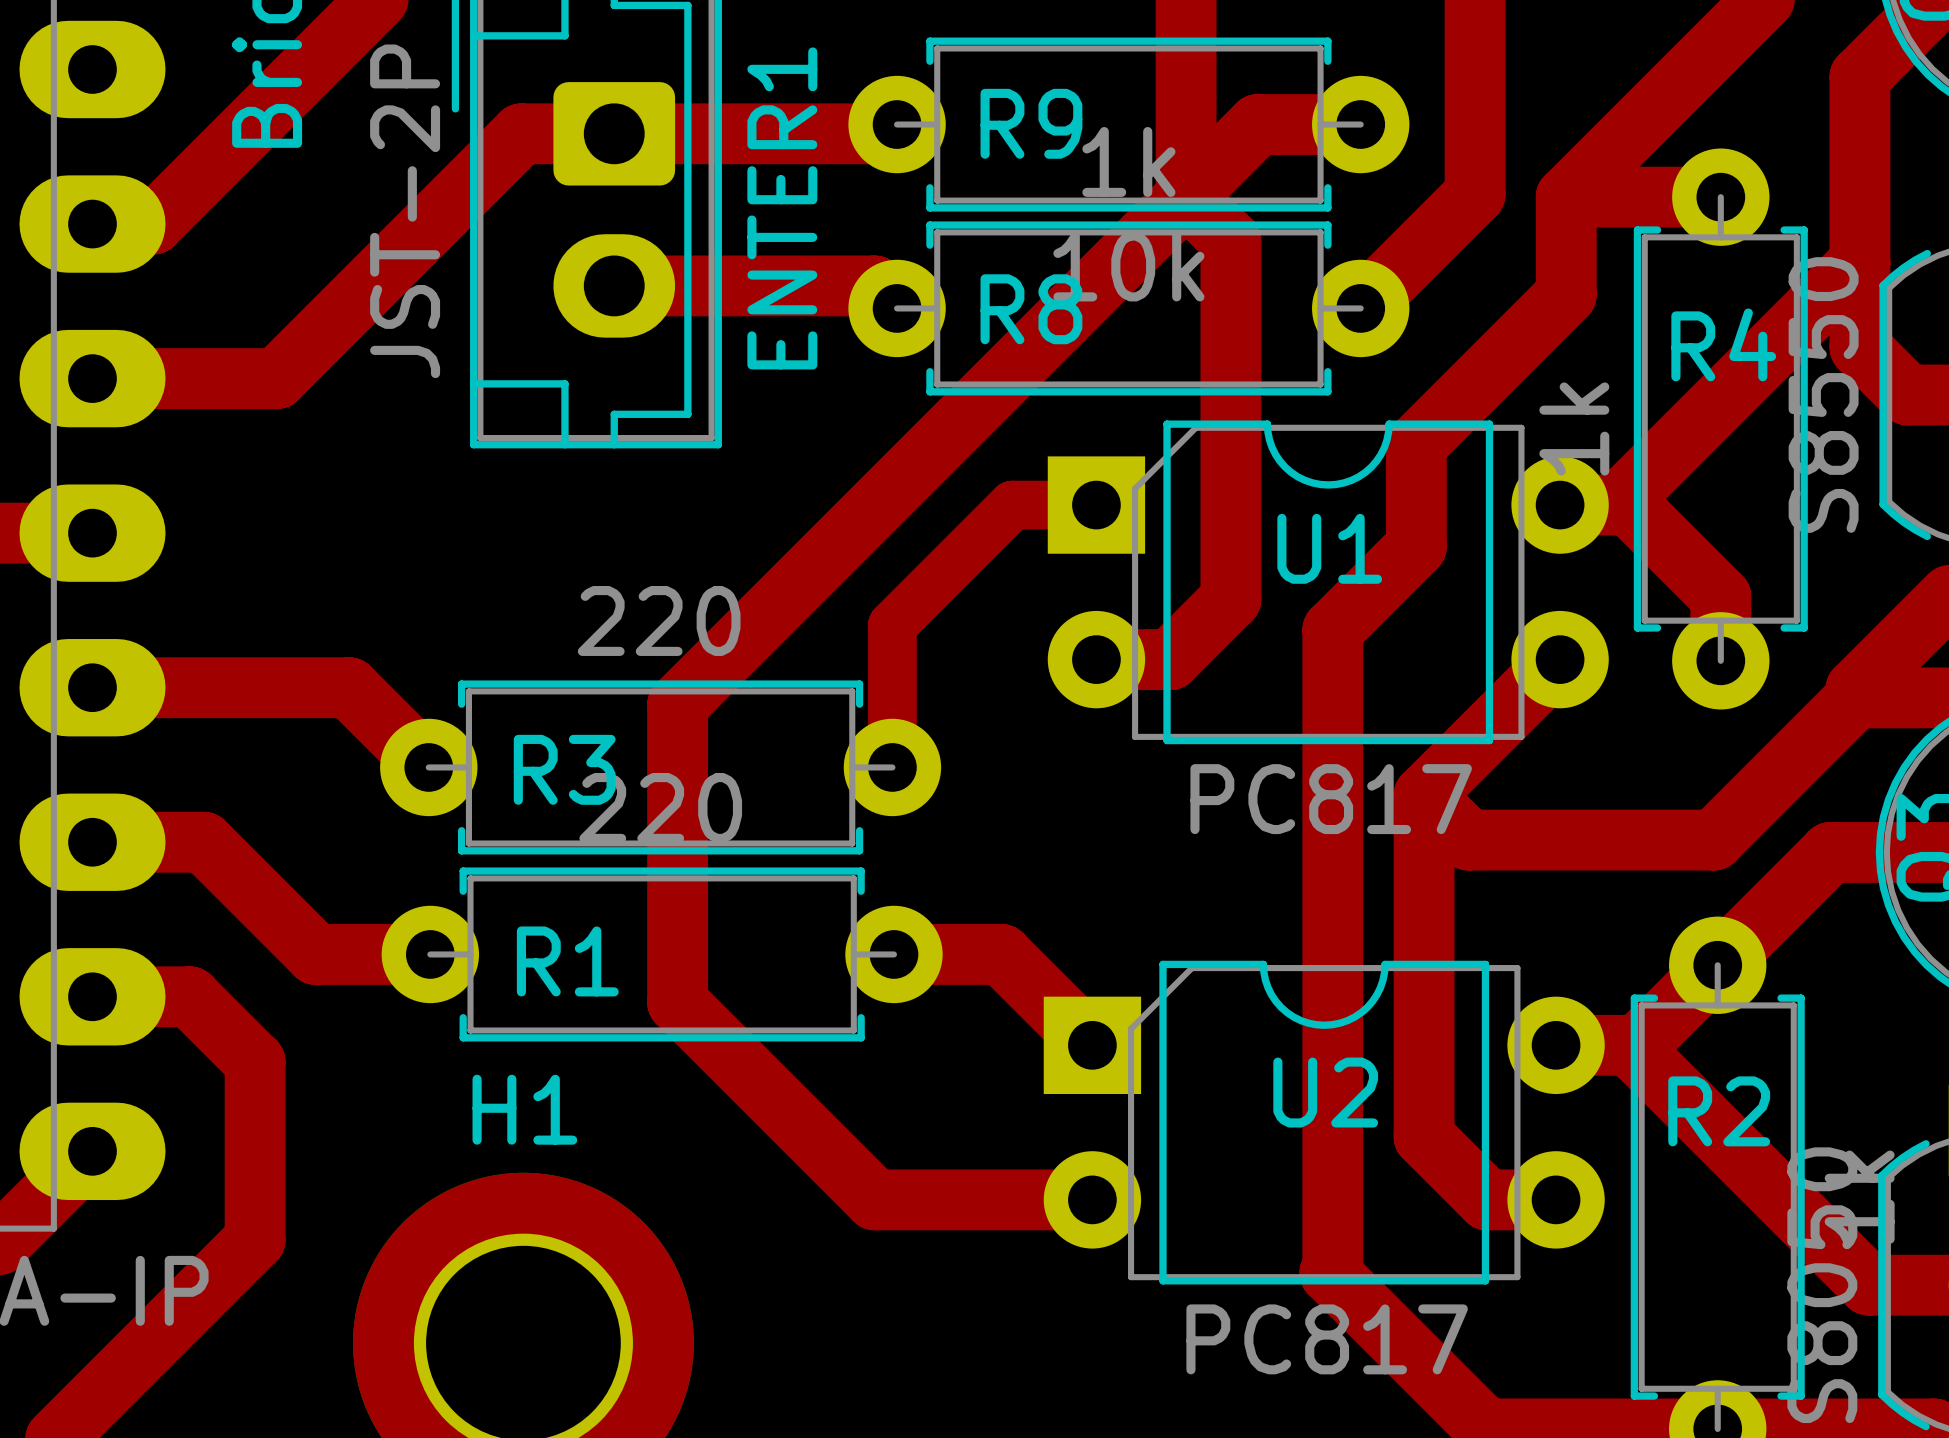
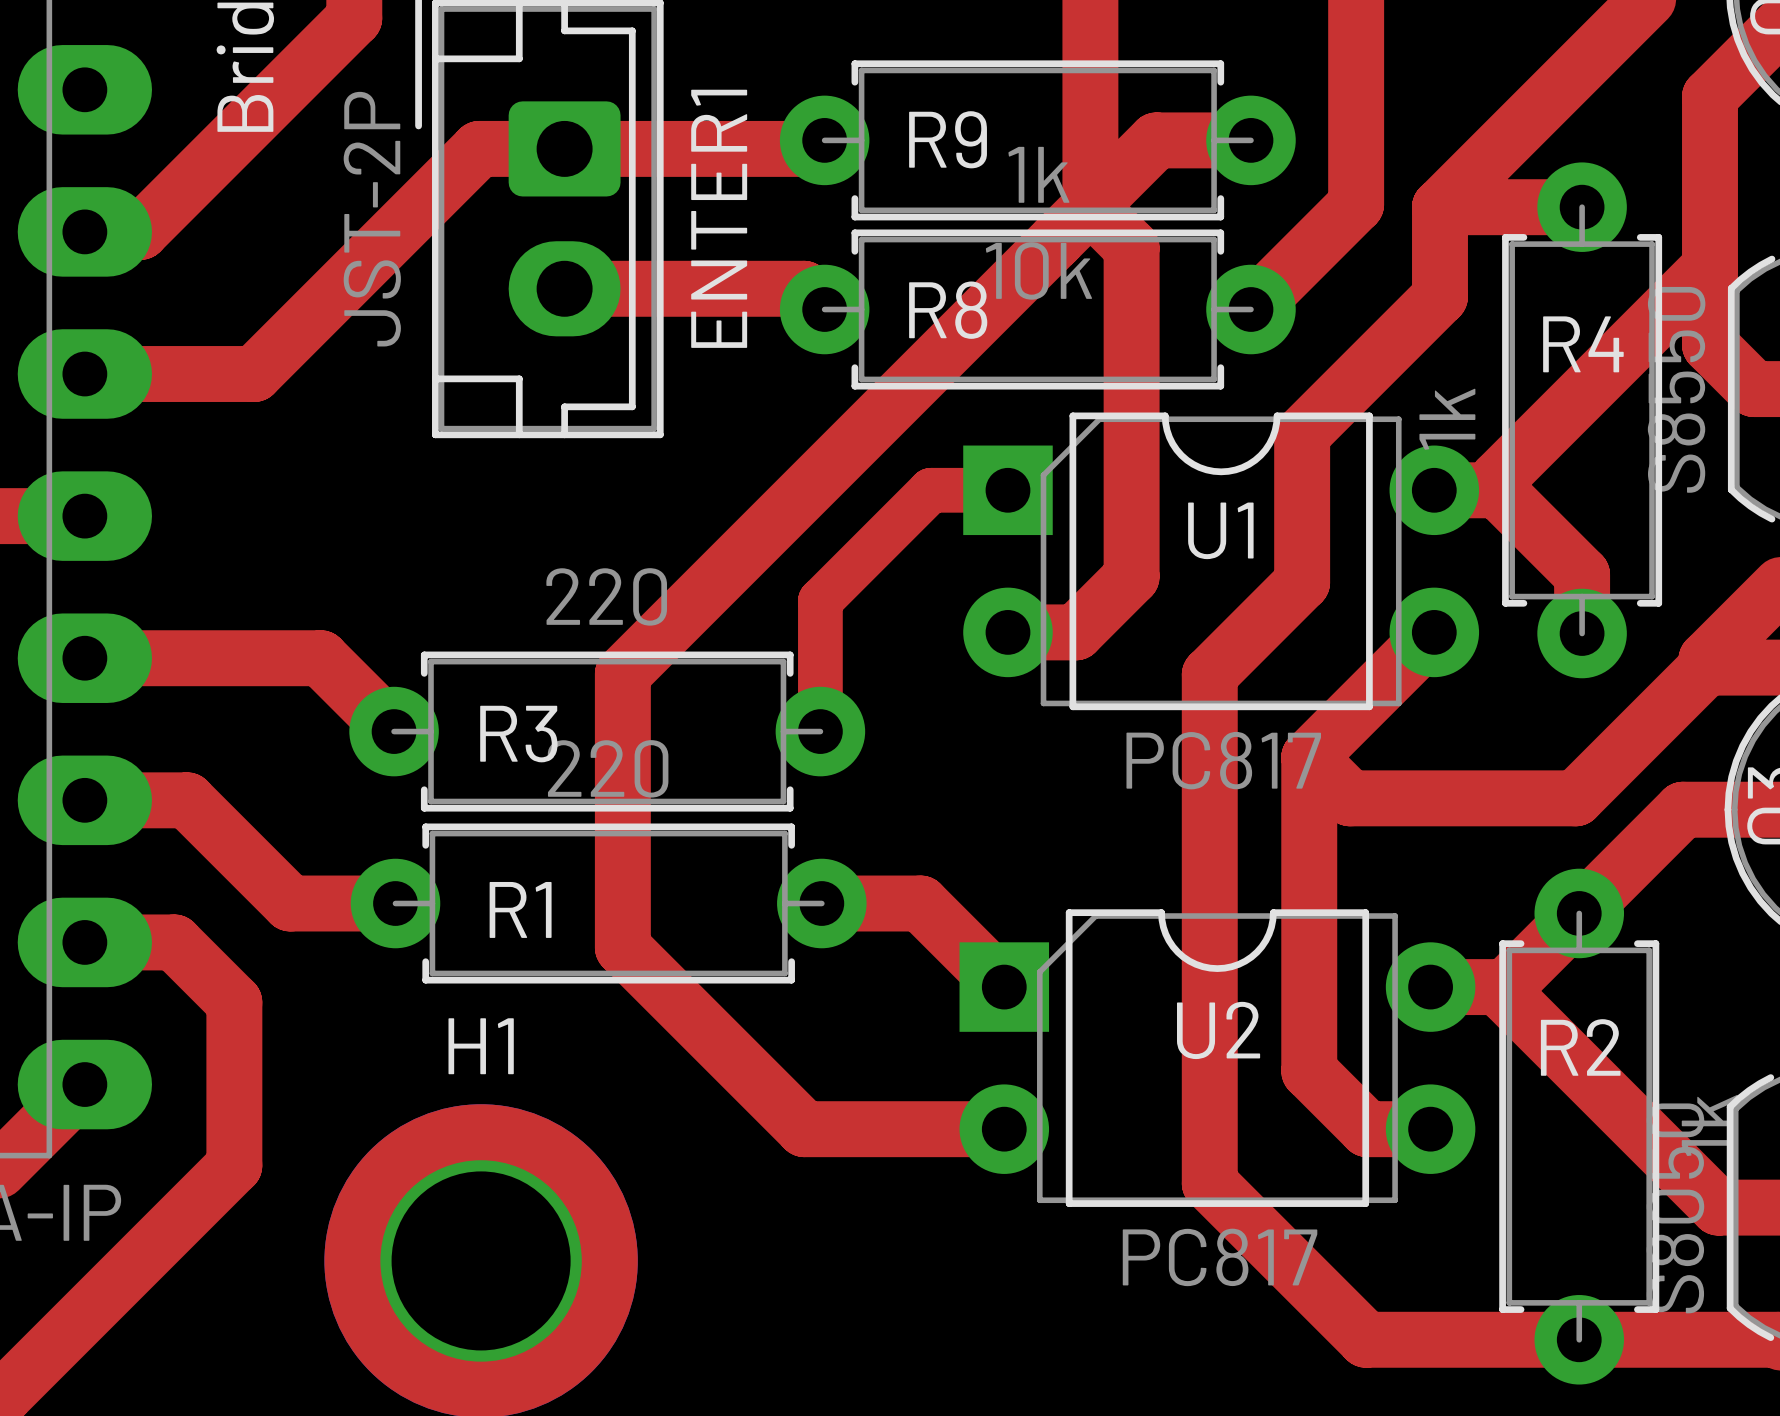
top track: (1416, 546) (1332, 629) (1332, 1269) (1329, 1272) -> (1302, 528) (1302, 582) (1209, 674) (1209, 1183) (1222, 1196)

